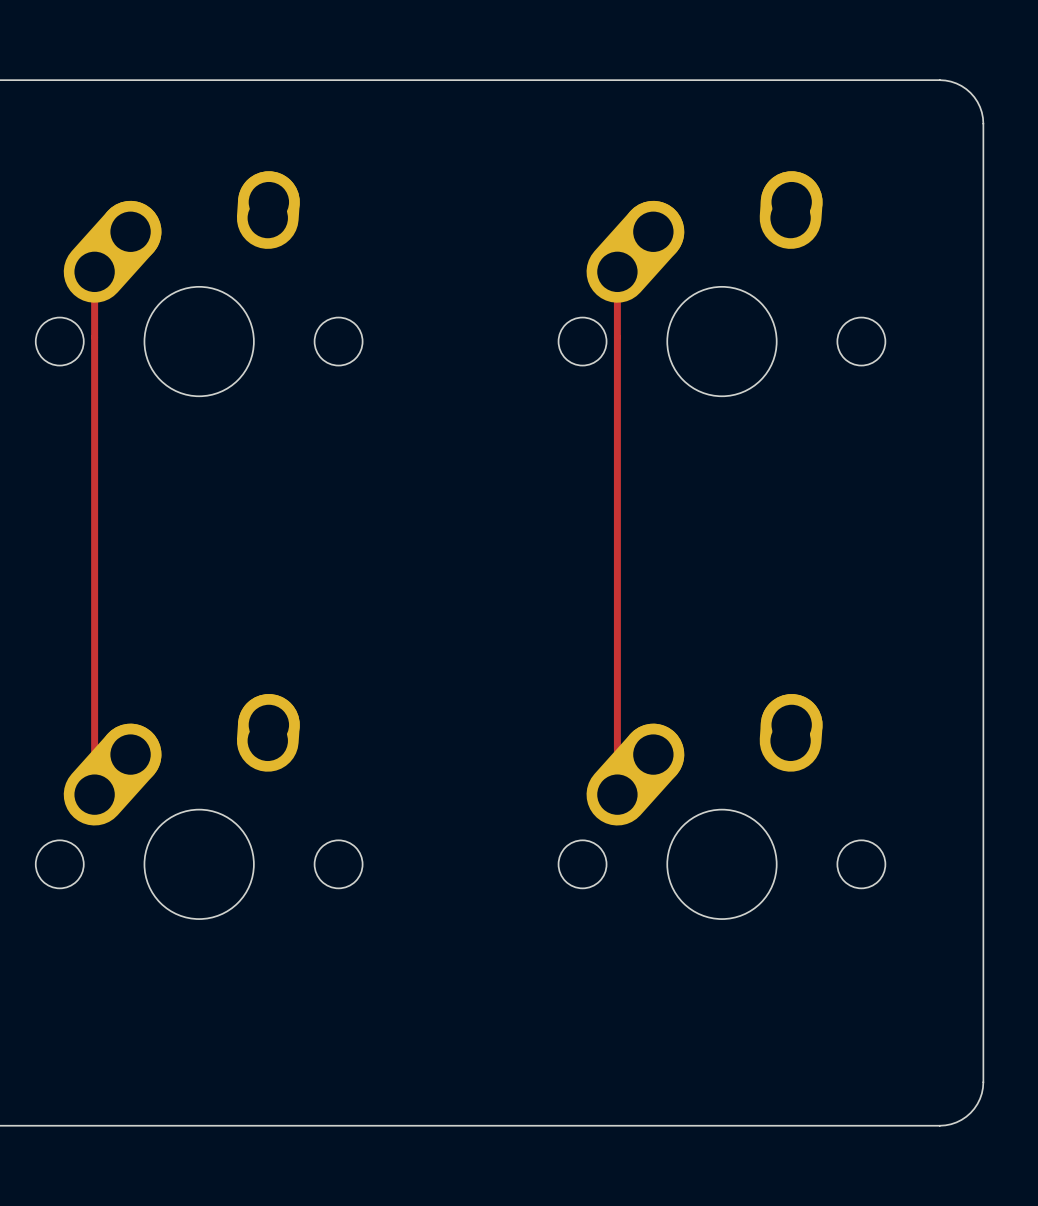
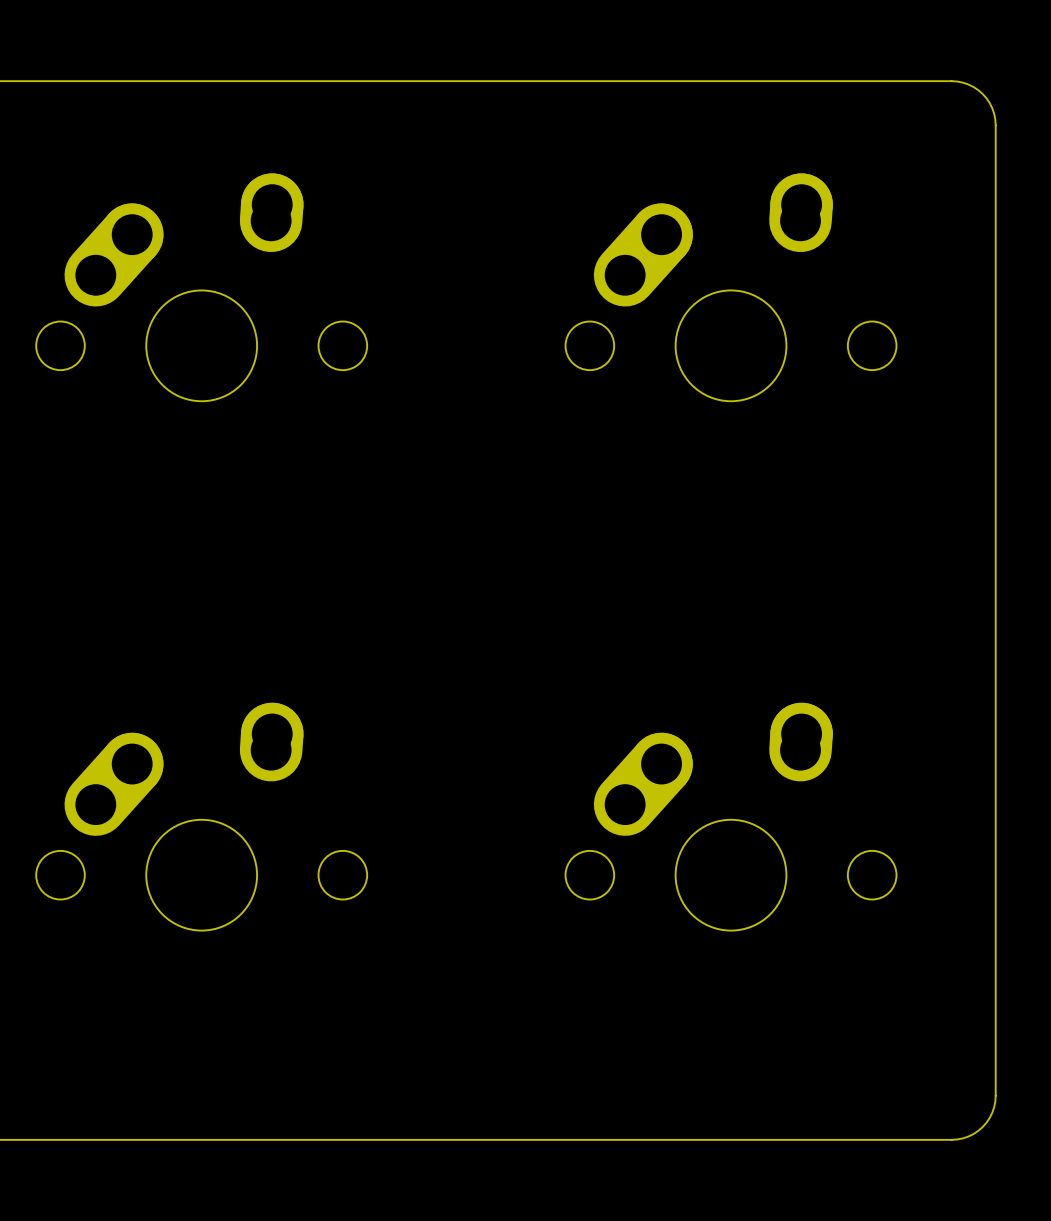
track: (94, 271) (94, 794) -> none
track: (617, 271) (617, 794) -> none

